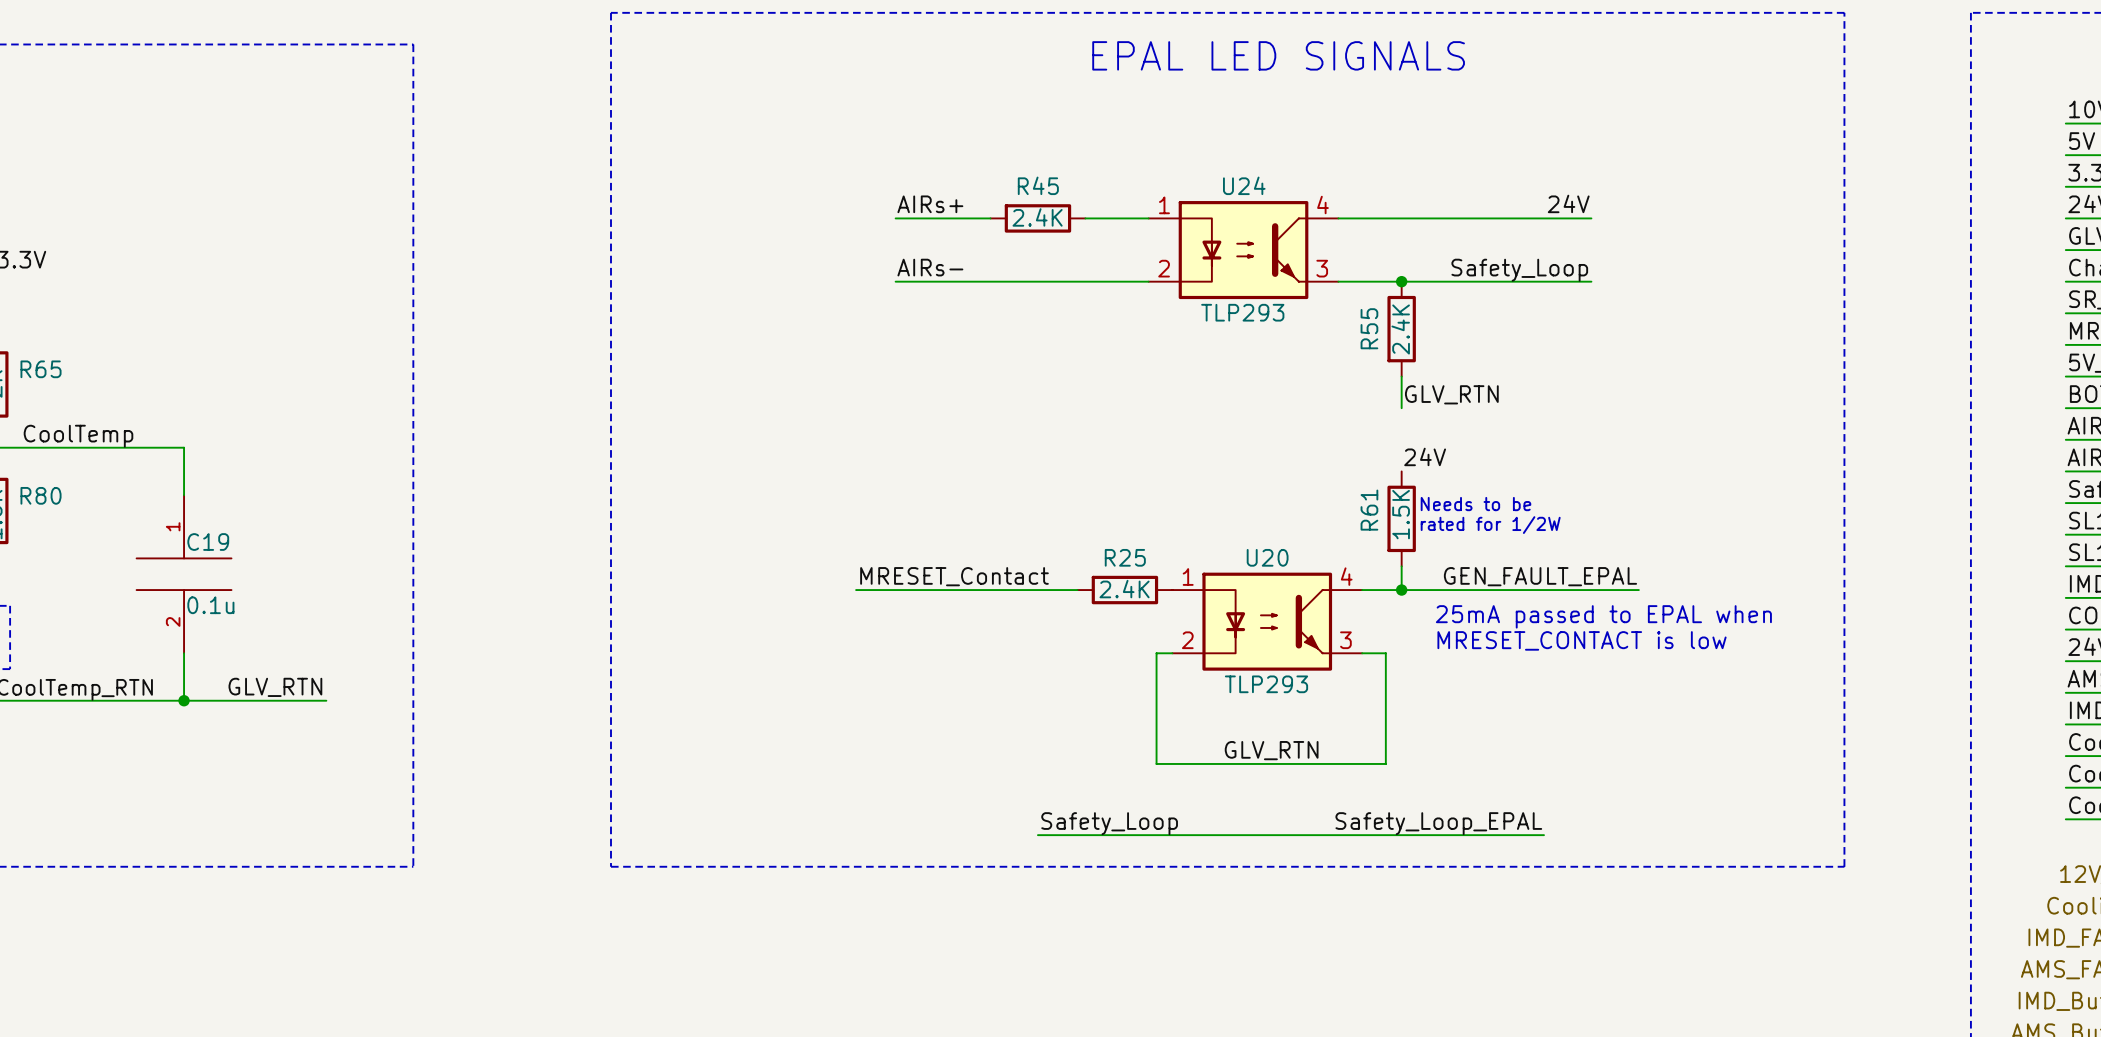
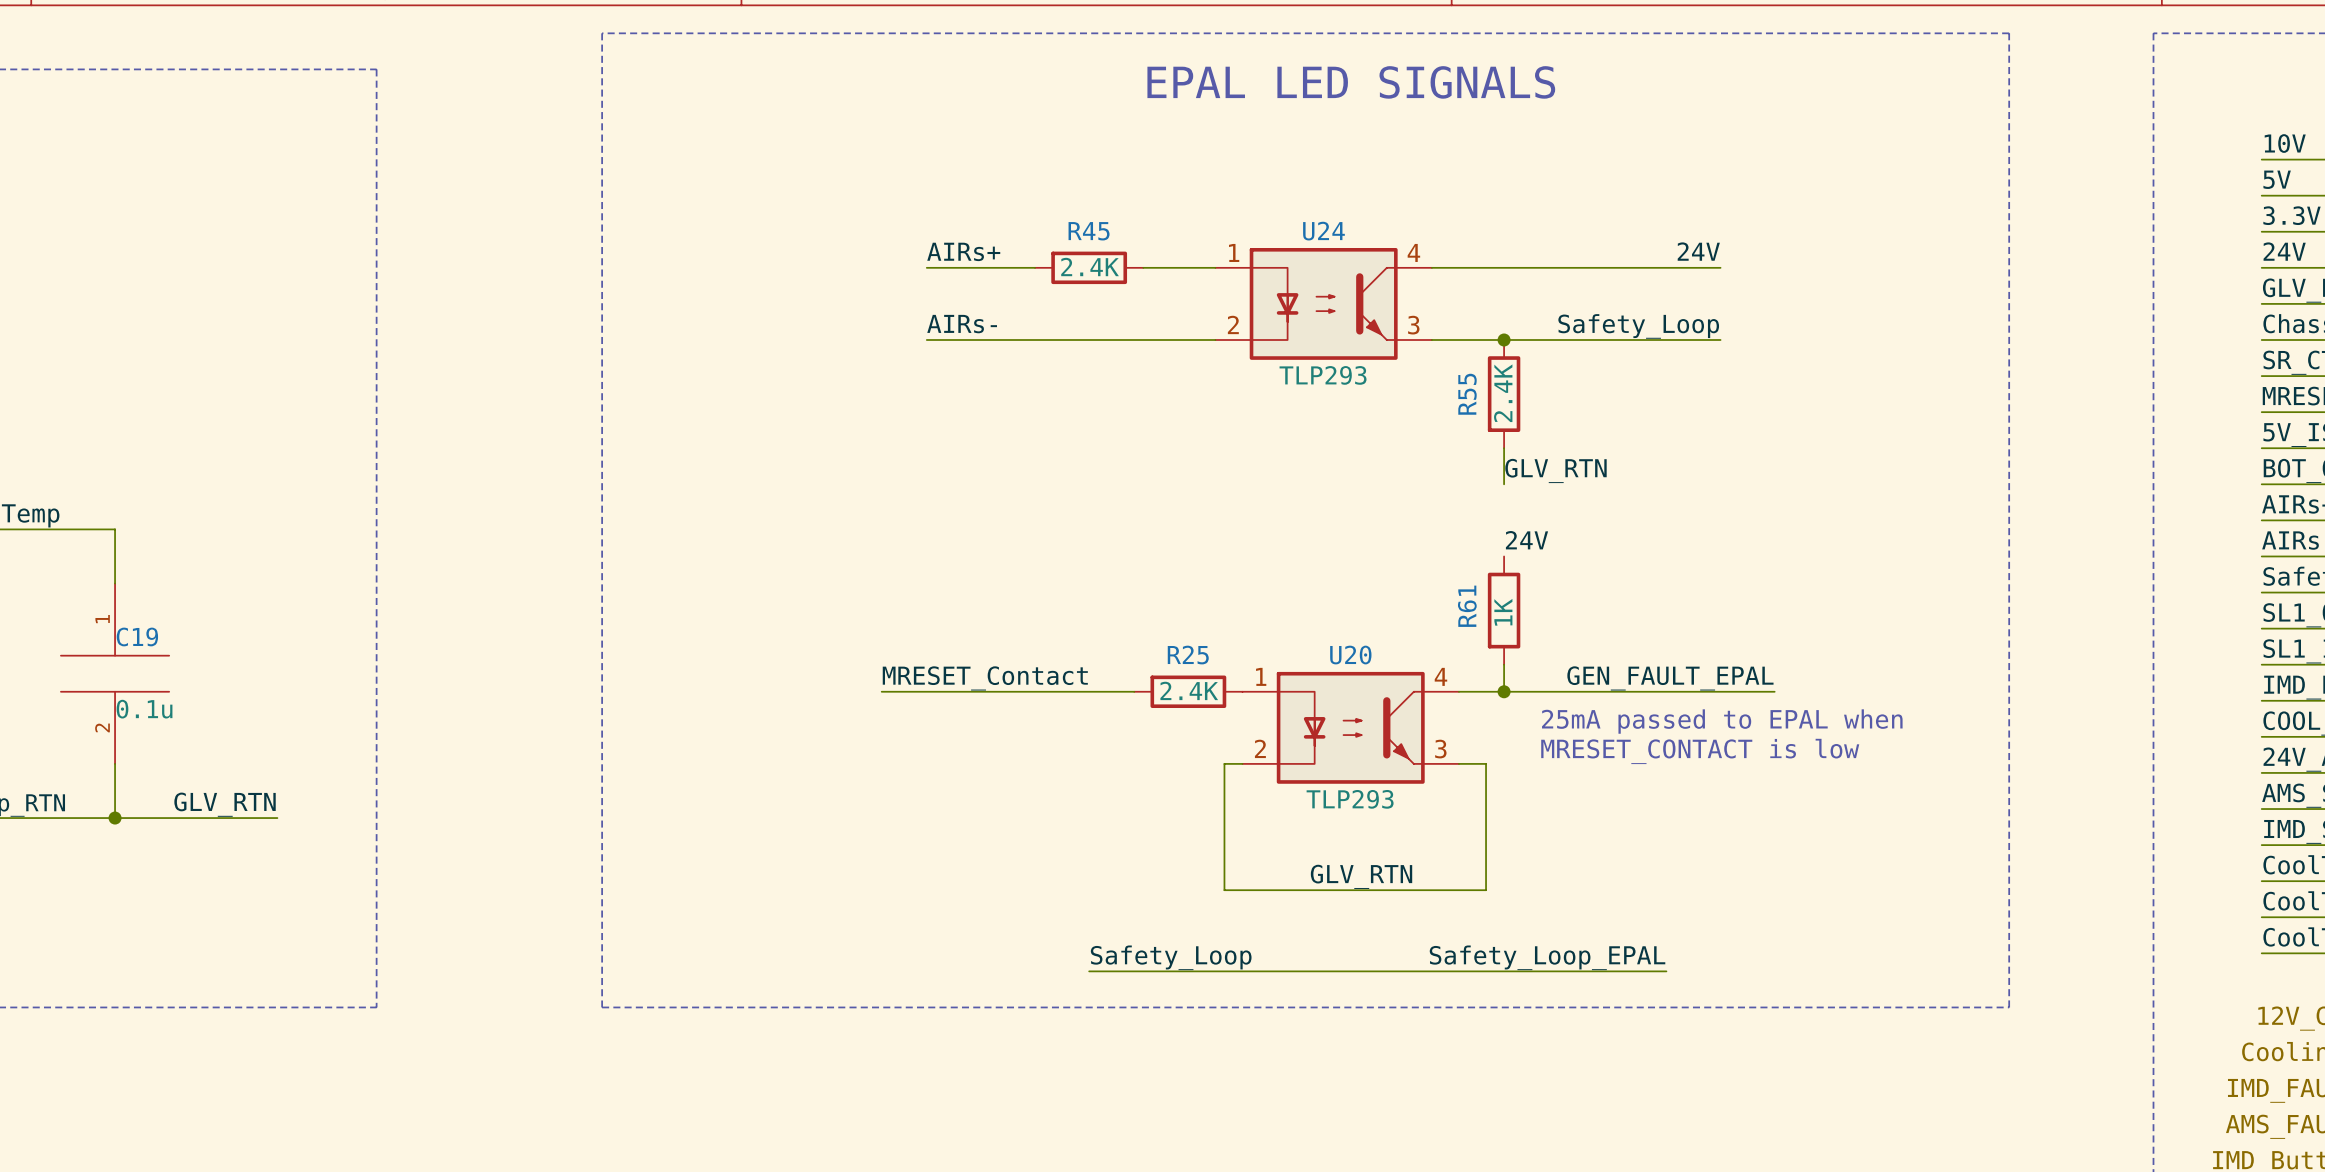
text: Needs to be (1475, 504) -> none
R61 value: 1.5K (1401, 514) -> 1K (1503, 612)
text: rated for 1/2W (1490, 525) -> none

